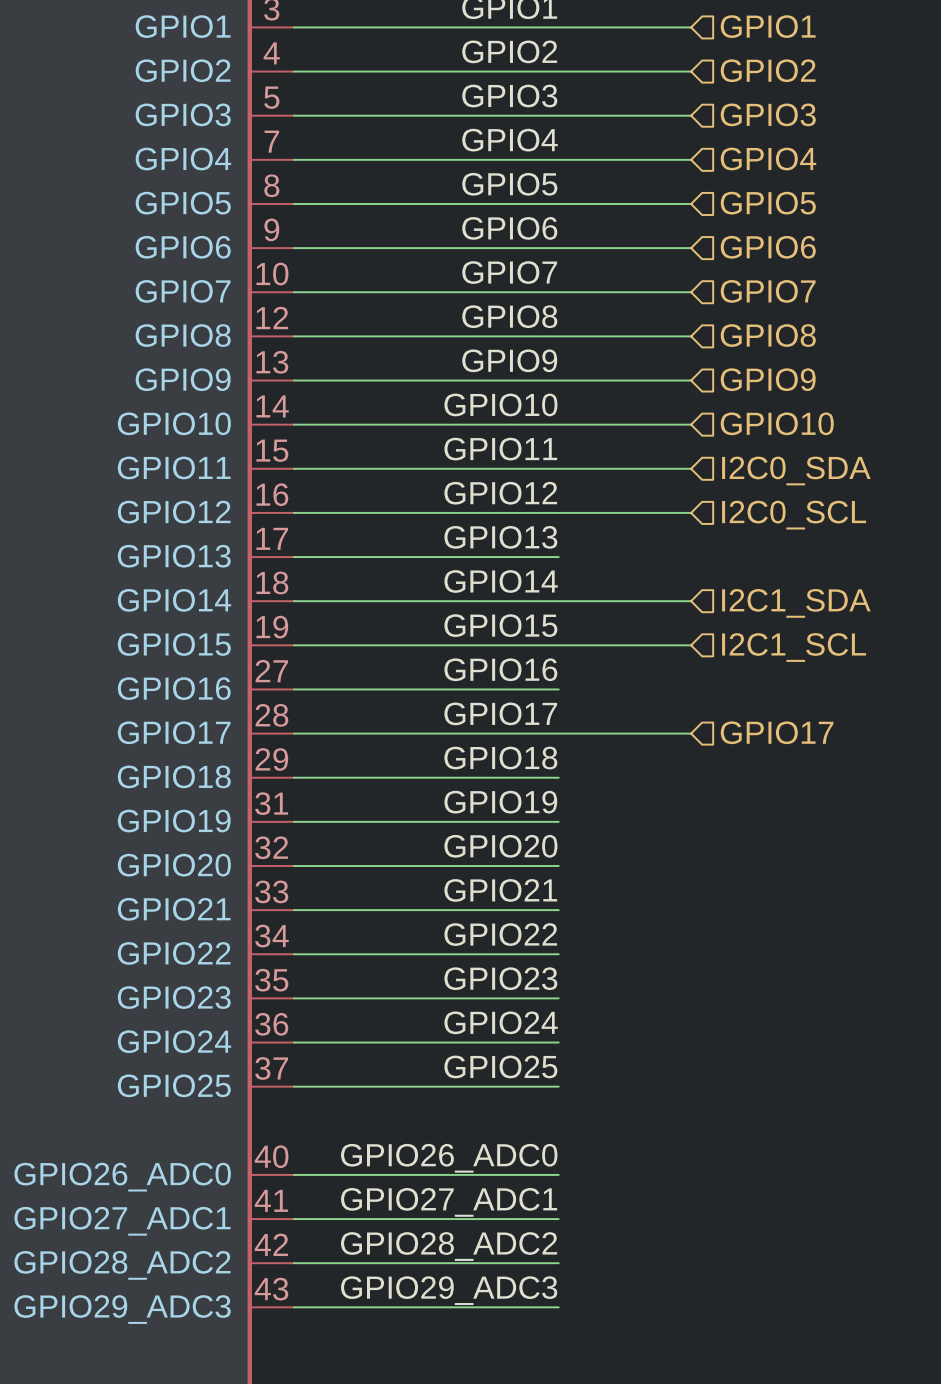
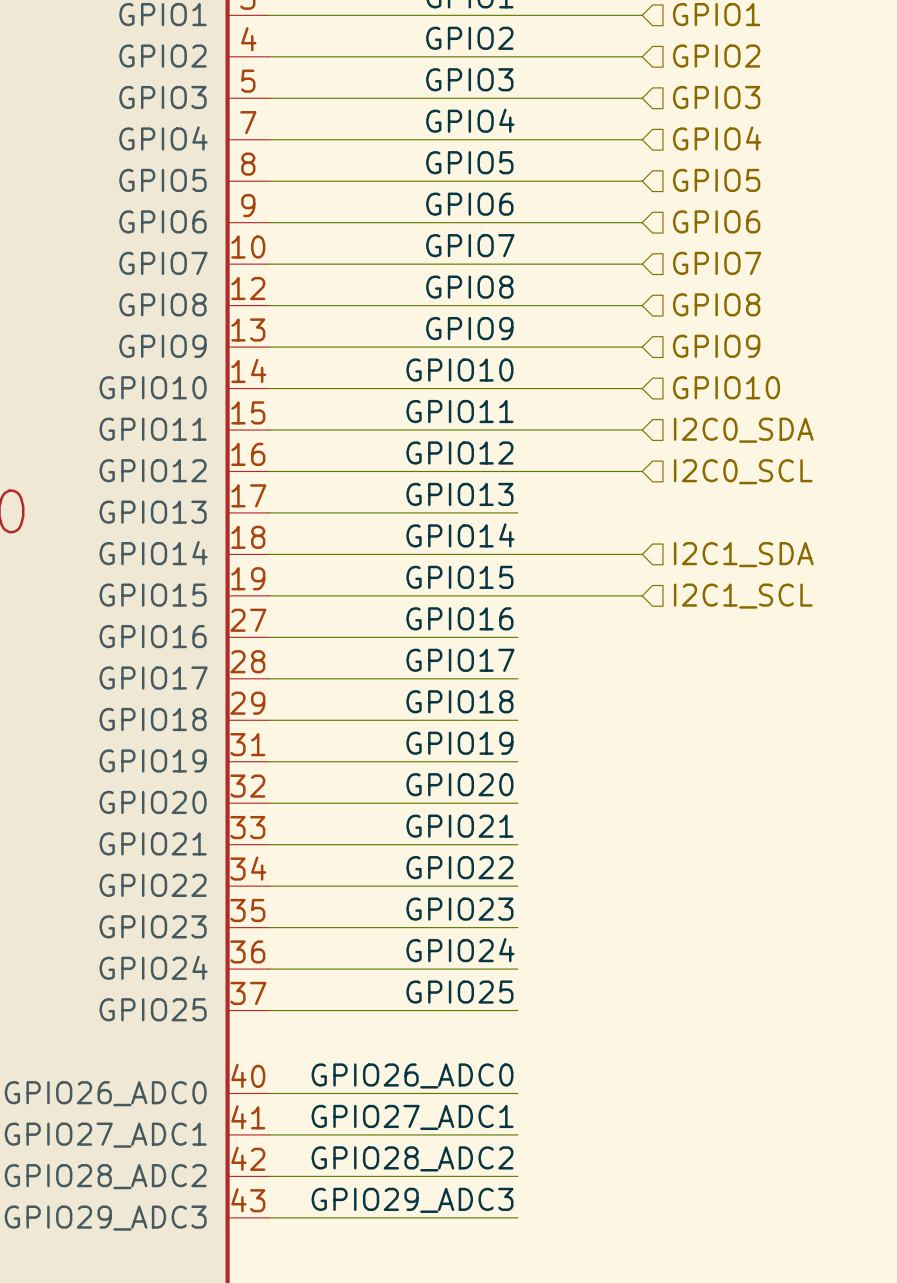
hierarchical label: GPIO17 (777, 732) -> none
wire: (558, 733) (691, 733) -> none

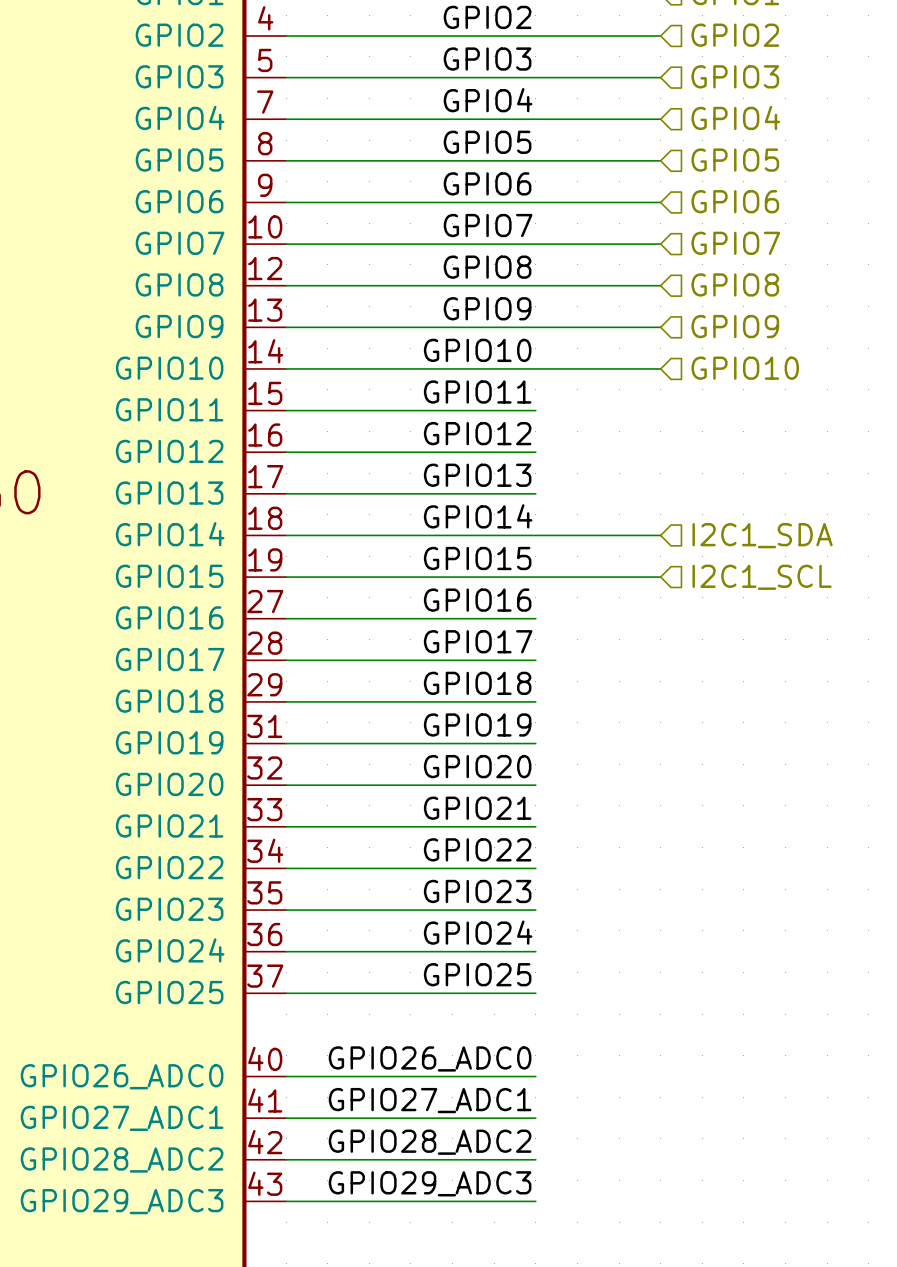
wire: (517, 430) (642, 430) -> none
hierarchical label: I2C0_SDA (743, 430) -> none
wire: (517, 471) (642, 471) -> none
hierarchical label: I2C0_SCL (743, 471) -> none

